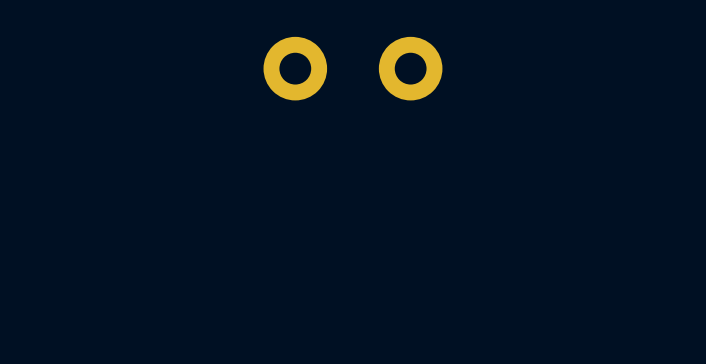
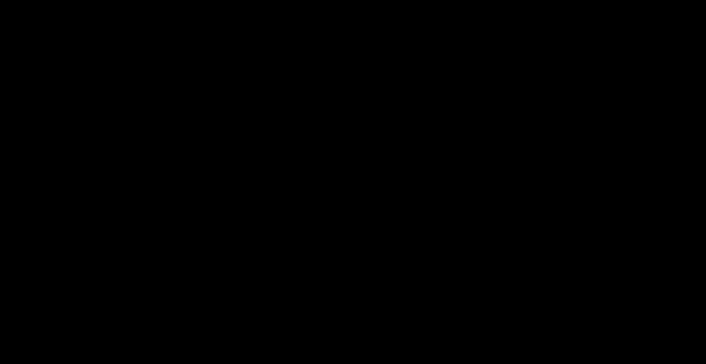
part: (352, 68) -> none

